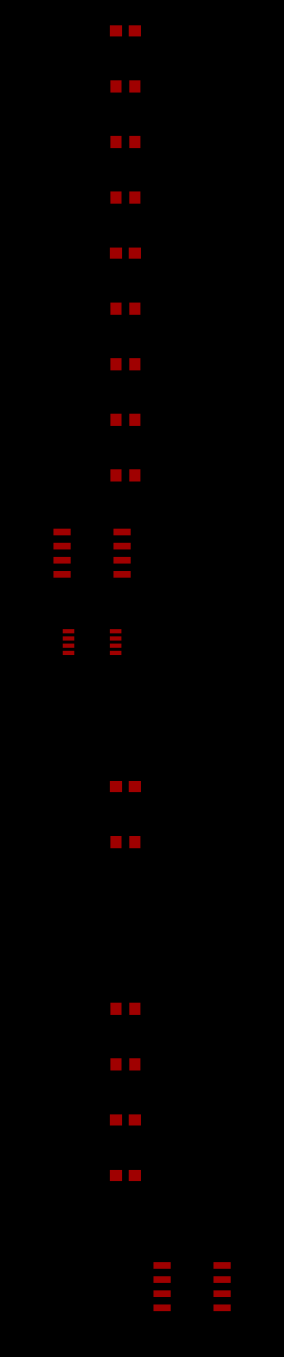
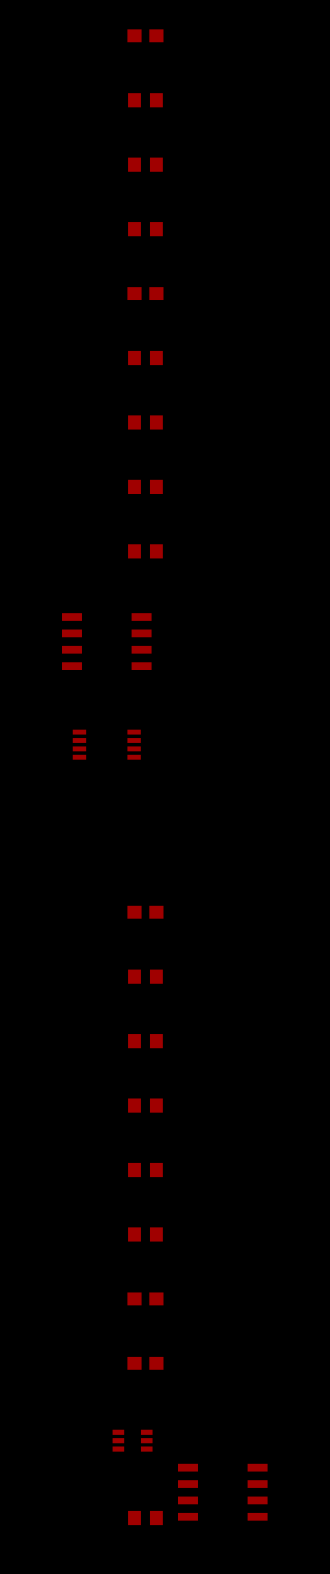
part: none -> (145, 1041)
part: none -> (145, 1105)
part: none -> (132, 1440)
part: none -> (145, 1518)

